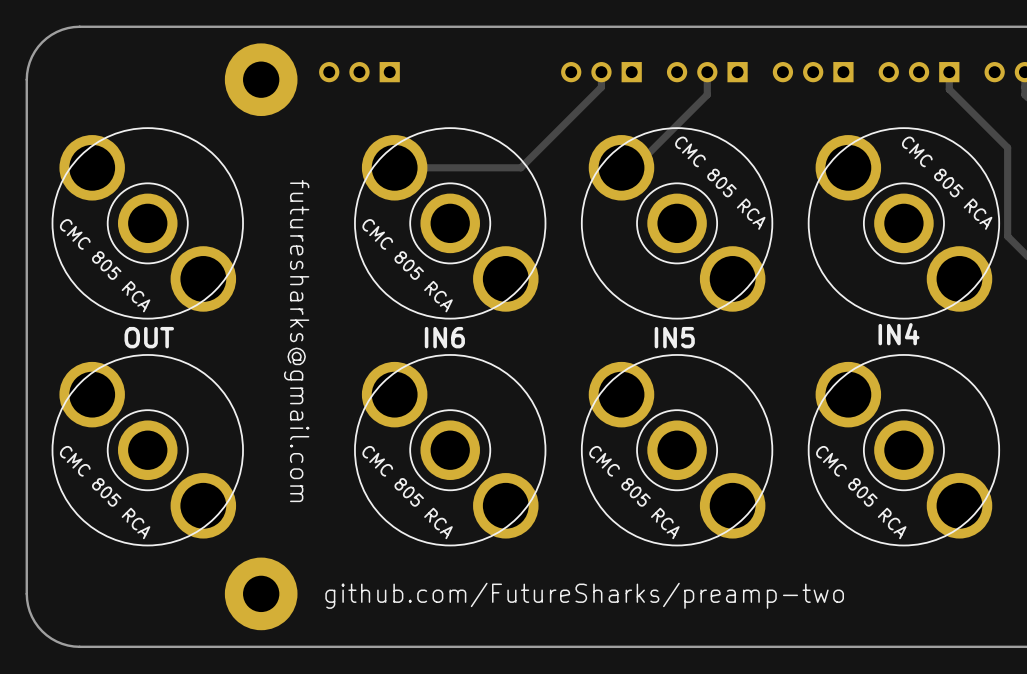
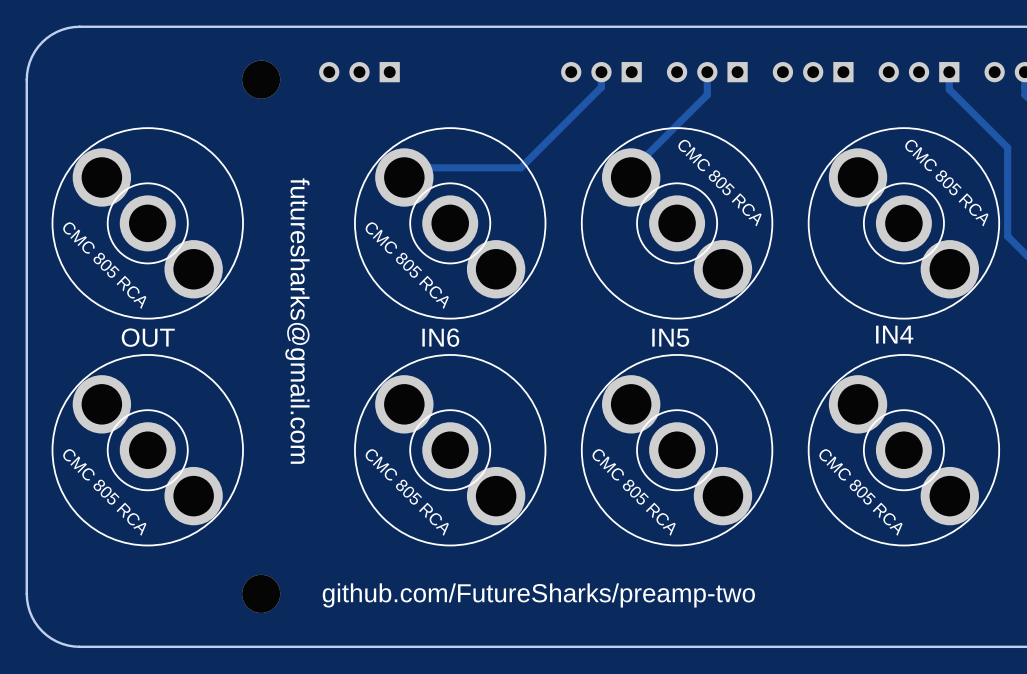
part footprint: [224, 43, 298, 117] -> [242, 60, 281, 99]
part footprint: [51, 127, 244, 320] -> [51, 127, 244, 320]
part footprint: [354, 127, 547, 320] -> [354, 127, 547, 320]
part footprint: [580, 127, 774, 320] -> [580, 127, 774, 320]
part footprint: [807, 127, 1001, 320] -> [807, 127, 1001, 320]
part footprint: [51, 354, 244, 547] -> [51, 354, 244, 547]
part footprint: [354, 354, 547, 547] -> [354, 354, 547, 547]
part footprint: [580, 354, 774, 547] -> [580, 354, 774, 547]
part footprint: [807, 354, 1001, 547] -> [807, 354, 1001, 547]
part footprint: [224, 557, 298, 631] -> [242, 574, 281, 613]

